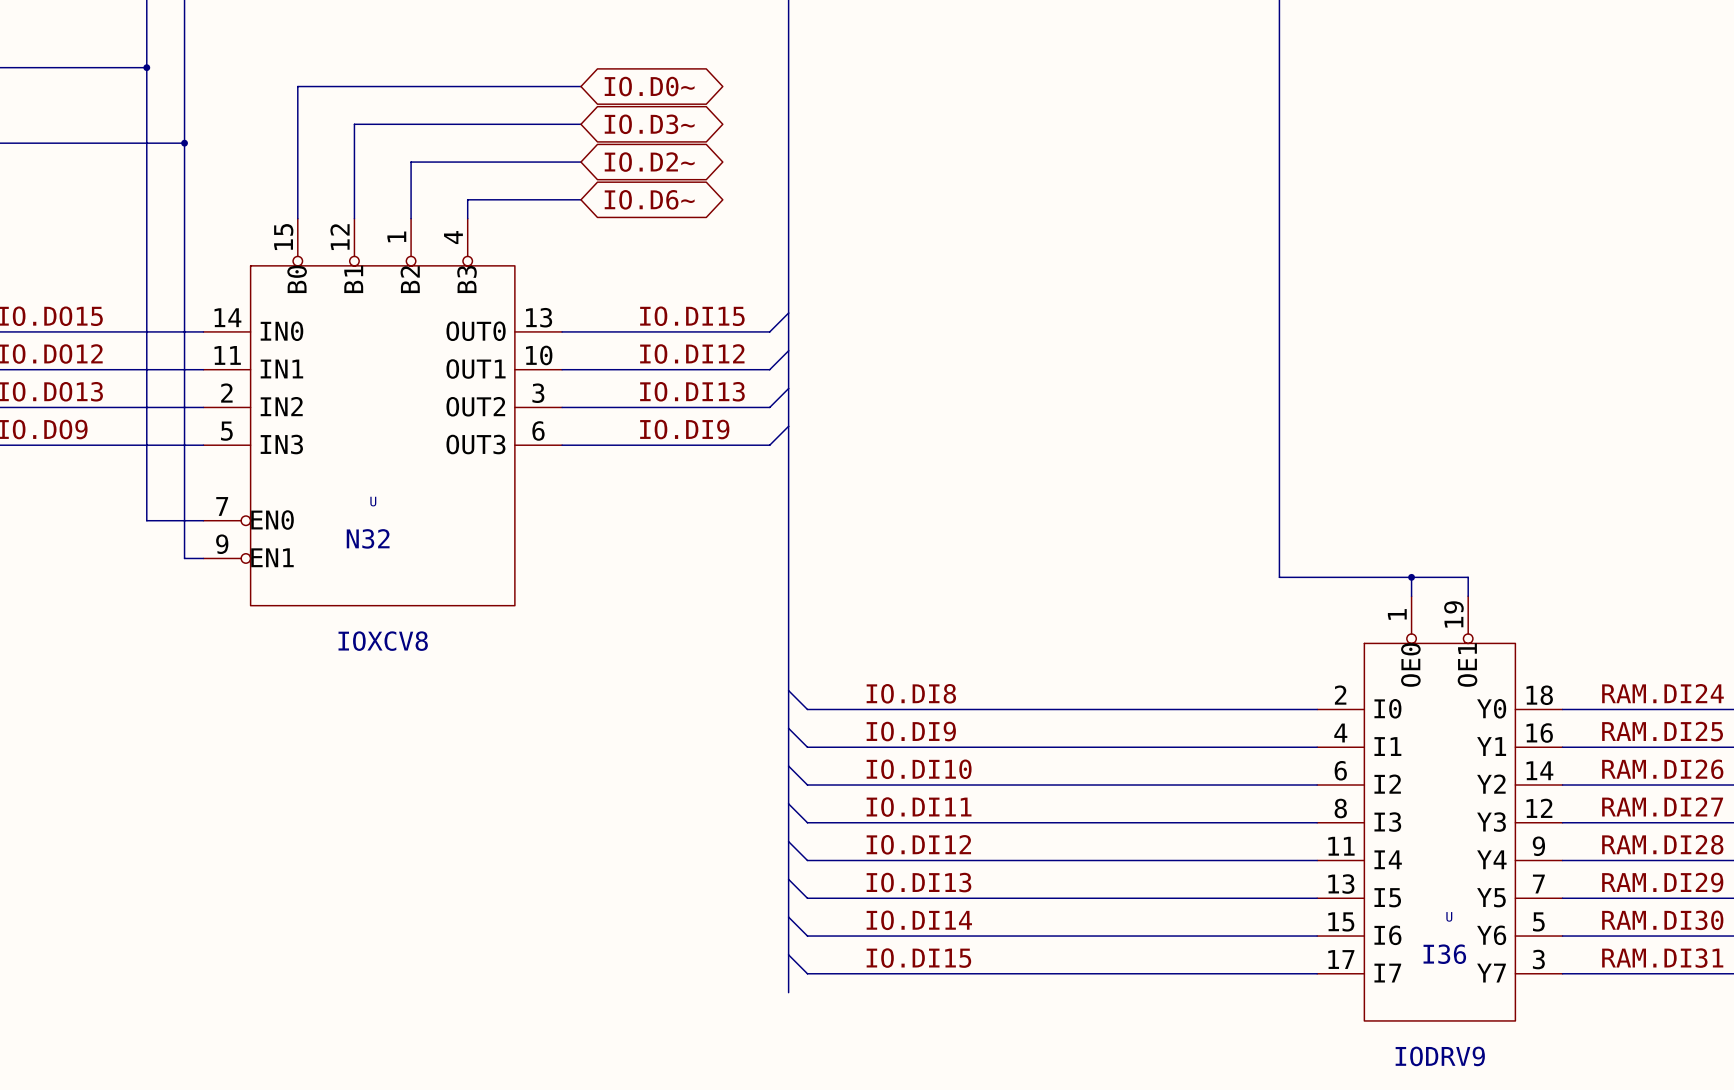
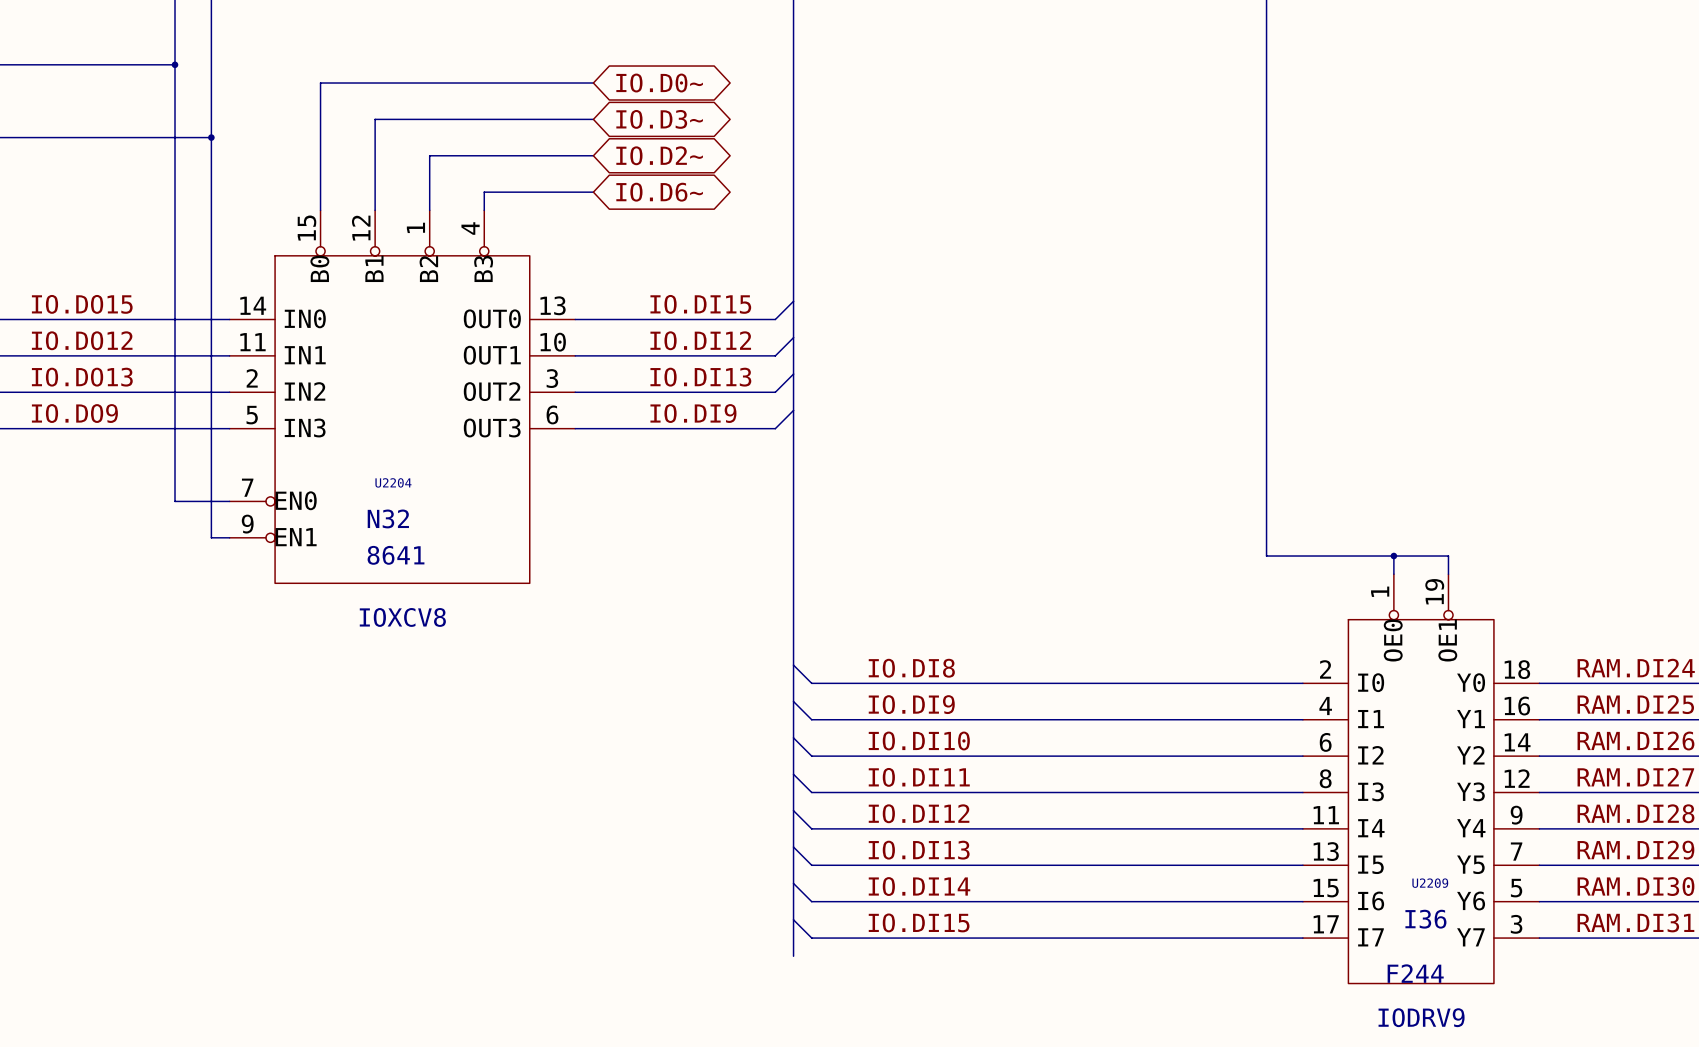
U name: U (373, 501) -> U2204 (393, 482)
U value: none -> 8641 (396, 555)
U name: U (1449, 916) -> U2209 (1430, 883)
U value: none -> F244 (1415, 973)

